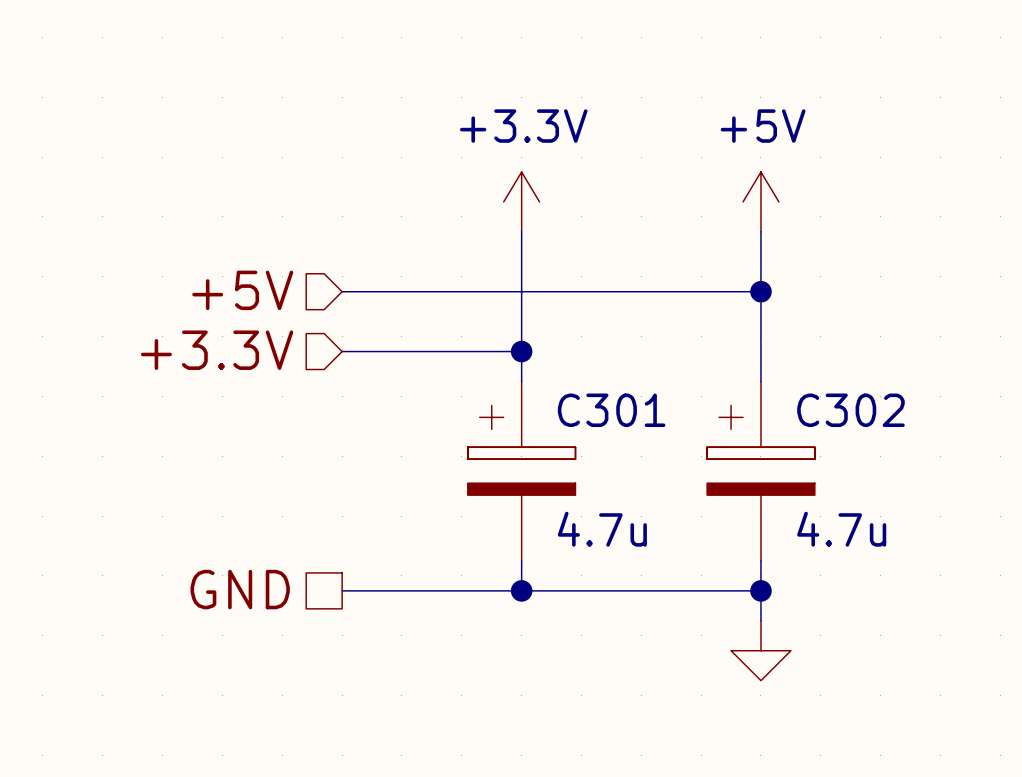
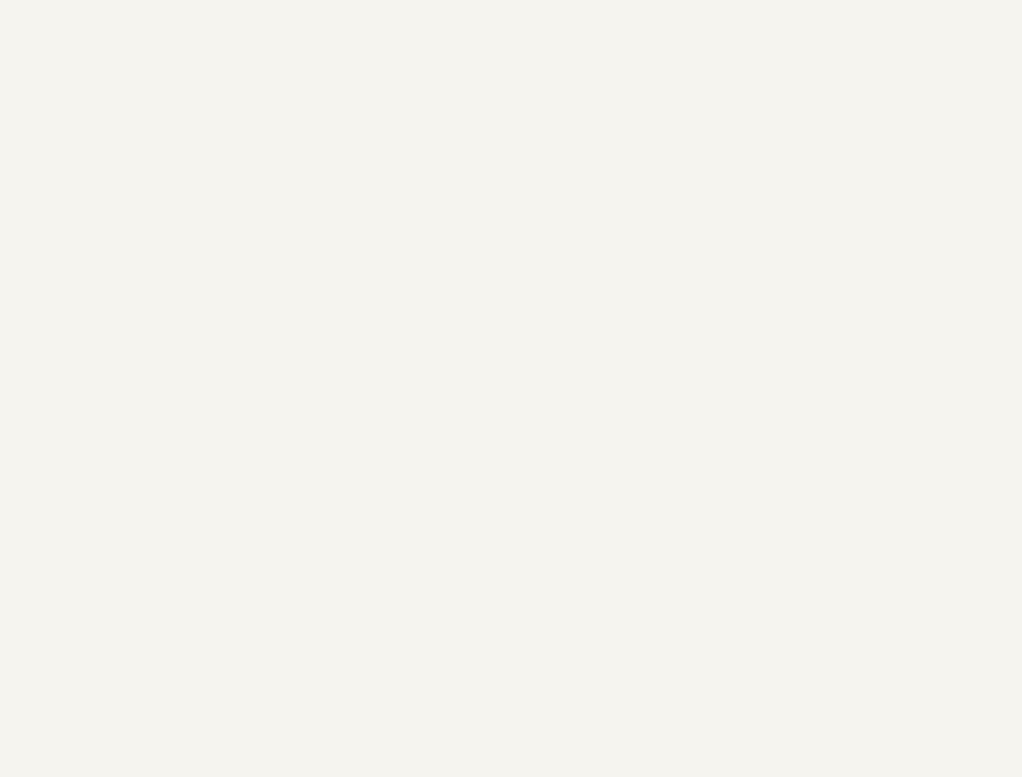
power symbol: +3.3V (521, 201) -> none
power symbol: +5V (760, 201) -> none
wire: (521, 231) (521, 381) -> none
wire: (760, 231) (760, 381) -> none
hierarchical label: +5V (242, 290) -> none
wire: (342, 291) (760, 291) -> none
junction: (760, 291) -> none
hierarchical label: +3.3V (217, 350) -> none
wire: (342, 351) (521, 351) -> none
junction: (521, 351) -> none
C301: 4.7u (521, 471) -> none
C302: 4.7u (760, 471) -> none
wire: (521, 560) (521, 590) -> none
wire: (760, 560) (760, 620) -> none
hierarchical label: GND (240, 589) -> none
wire: (342, 590) (760, 590) -> none
junction: (521, 590) -> none
junction: (760, 590) -> none
power symbol: (760, 650) -> none

